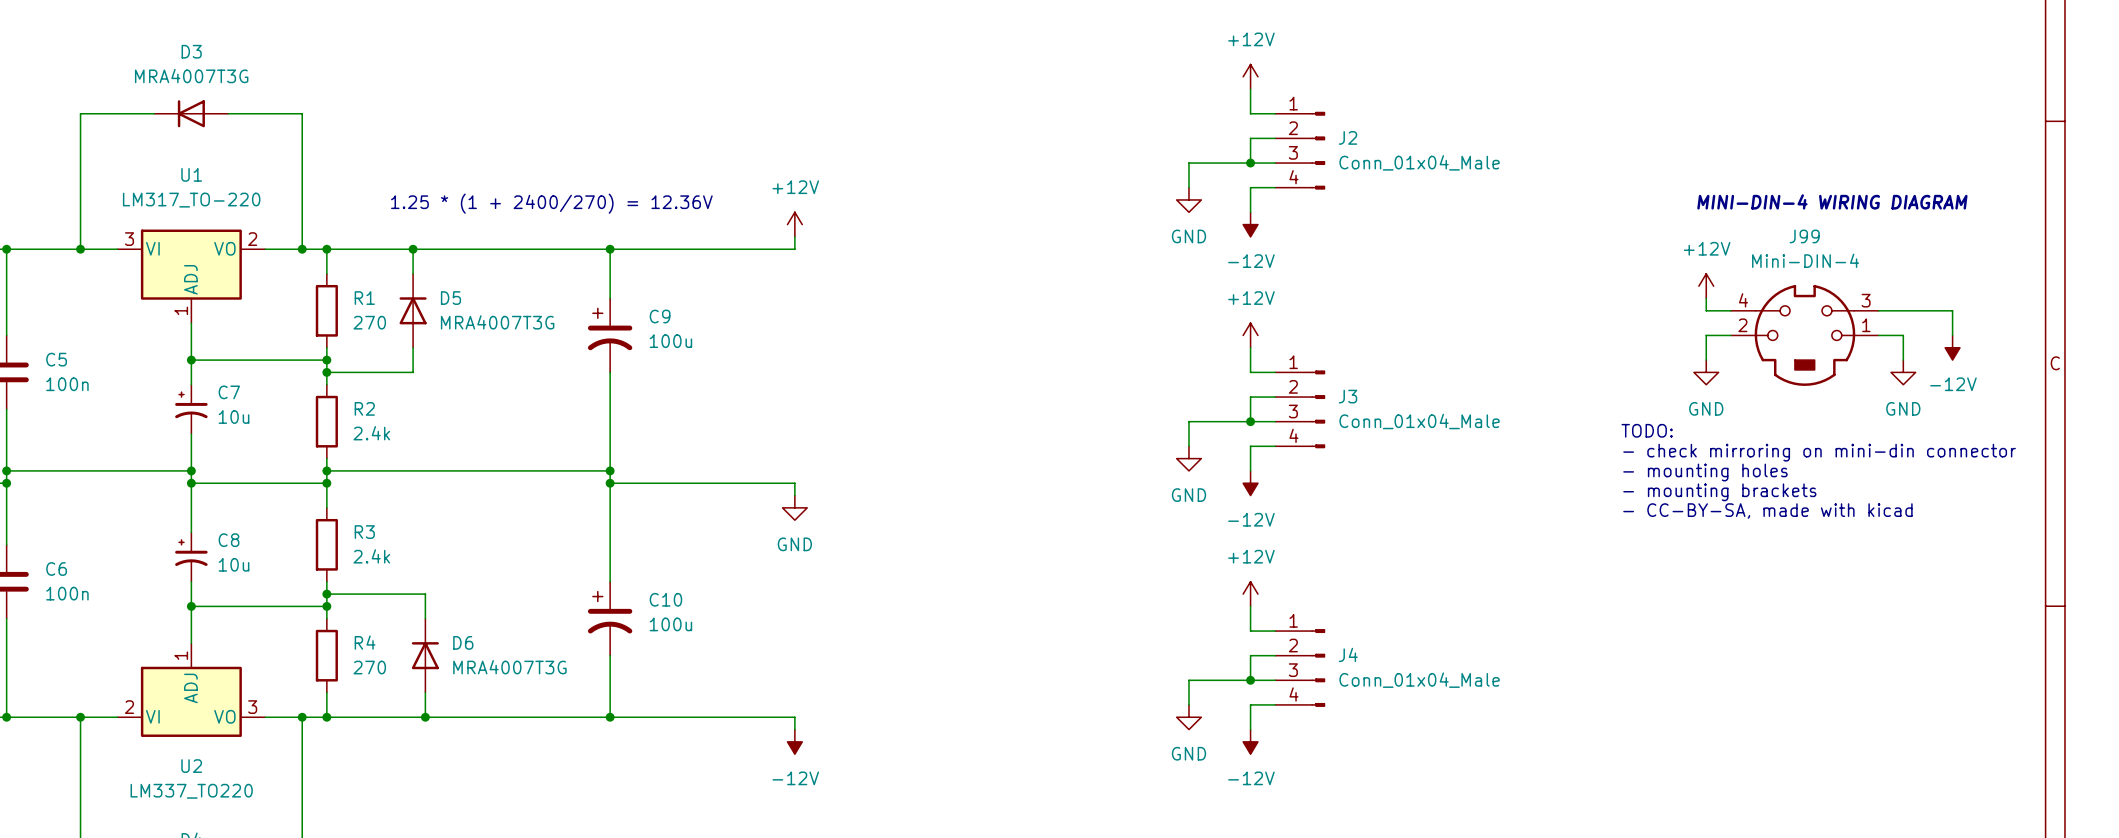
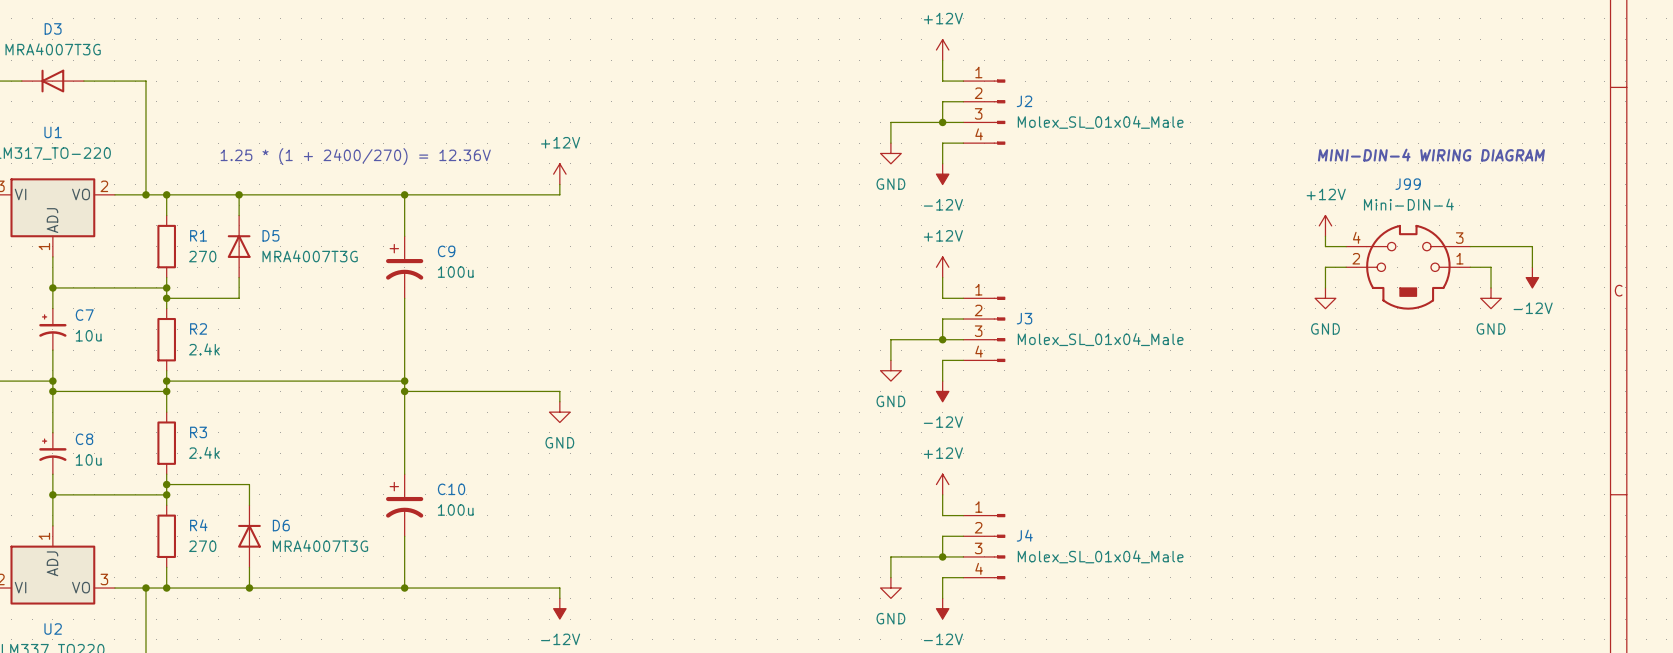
J2 value: Conn_01x04_Male (1419, 162) -> Molex_SL_01x04_Male (1100, 122)
J3 value: Conn_01x04_Male (1419, 421) -> Molex_SL_01x04_Male (1100, 339)
text: TODO: (1647, 430) -> none
text: - check mirroring on mini-din connector (1819, 452) -> none
text: - mounting holes (1705, 472) -> none
text: - mounting brackets (1719, 492) -> none
text: - CC-BY-SA, made with kicad (1767, 510) -> none
J4 value: Conn_01x04_Male (1419, 680) -> Molex_SL_01x04_Male (1100, 556)

